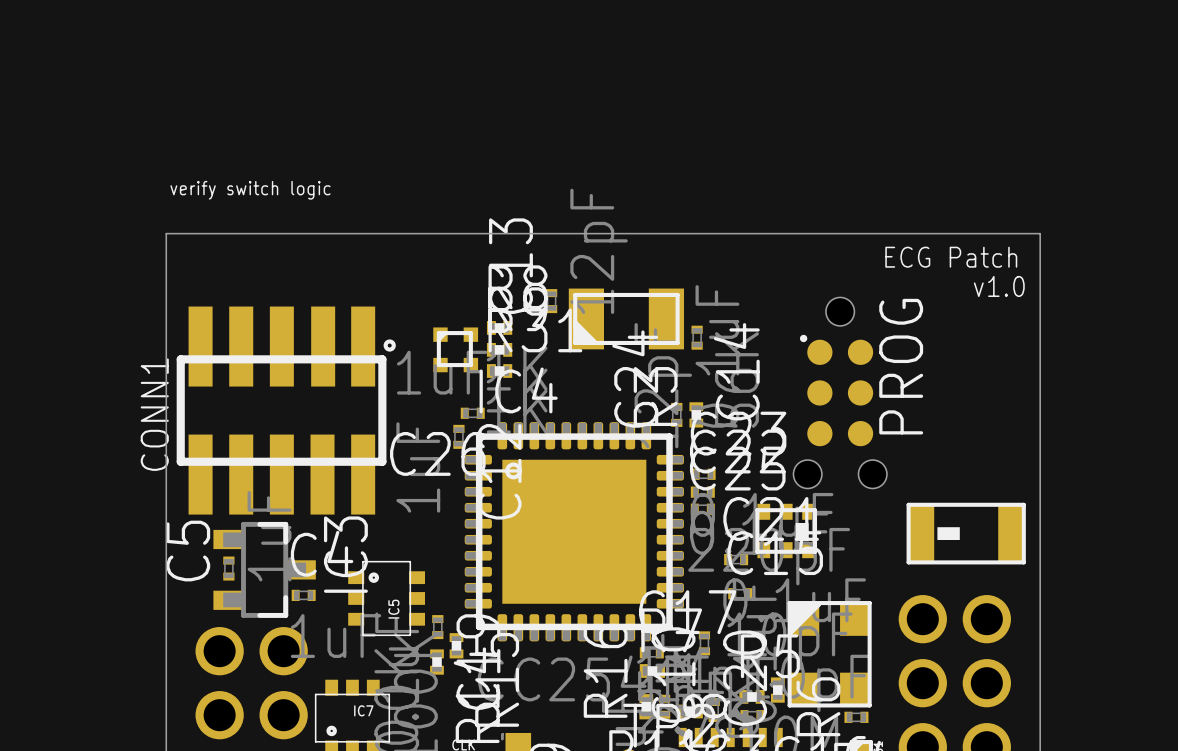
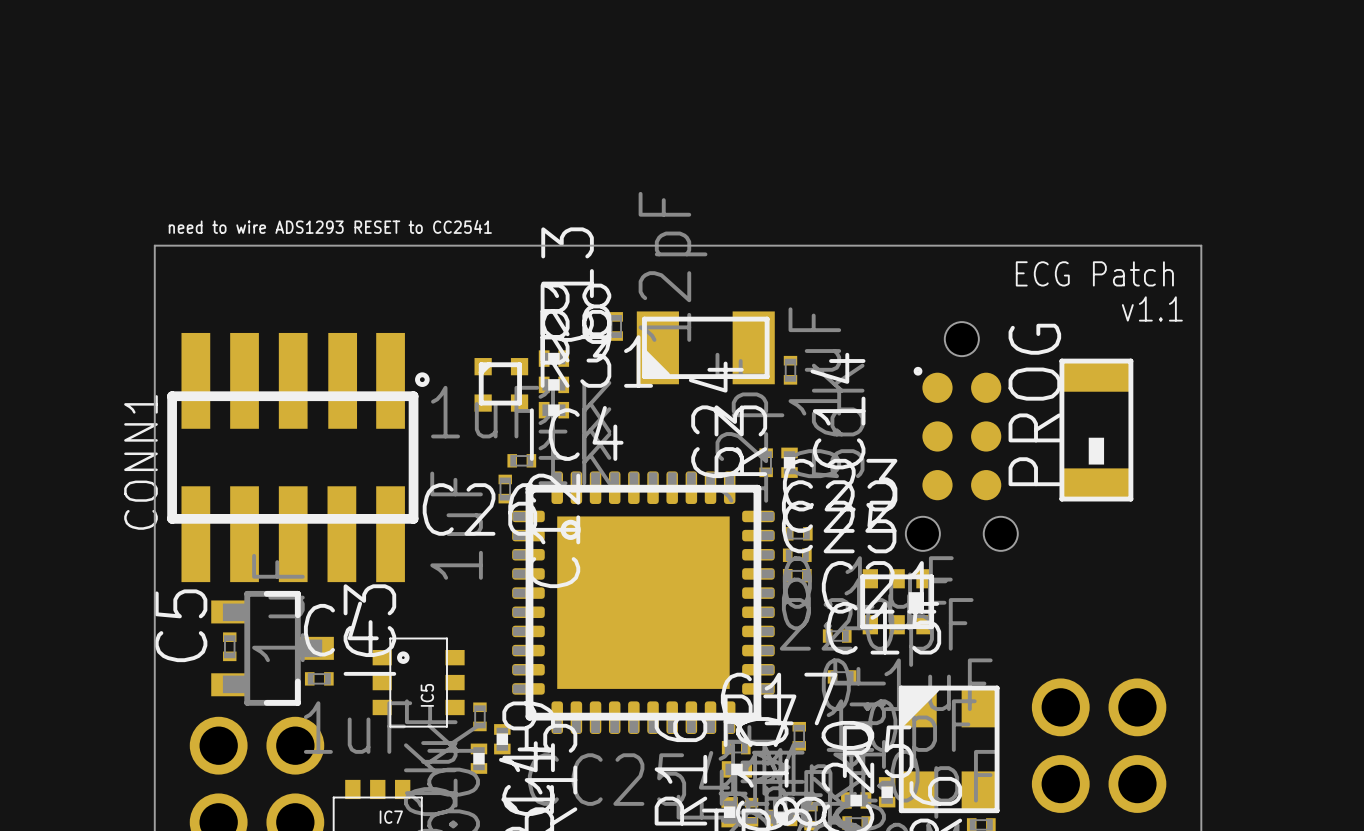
text: verify switch logic (250, 190) -> need to wire ADS1293 RESET to CC2541 (330, 226)
text: v1.0 (999, 286) -> v1.1 (1152, 308)
part rotation: 0° (966, 533) -> 90° counterclockwise (1096, 430)
part position: (966, 533) -> (1096, 430)

